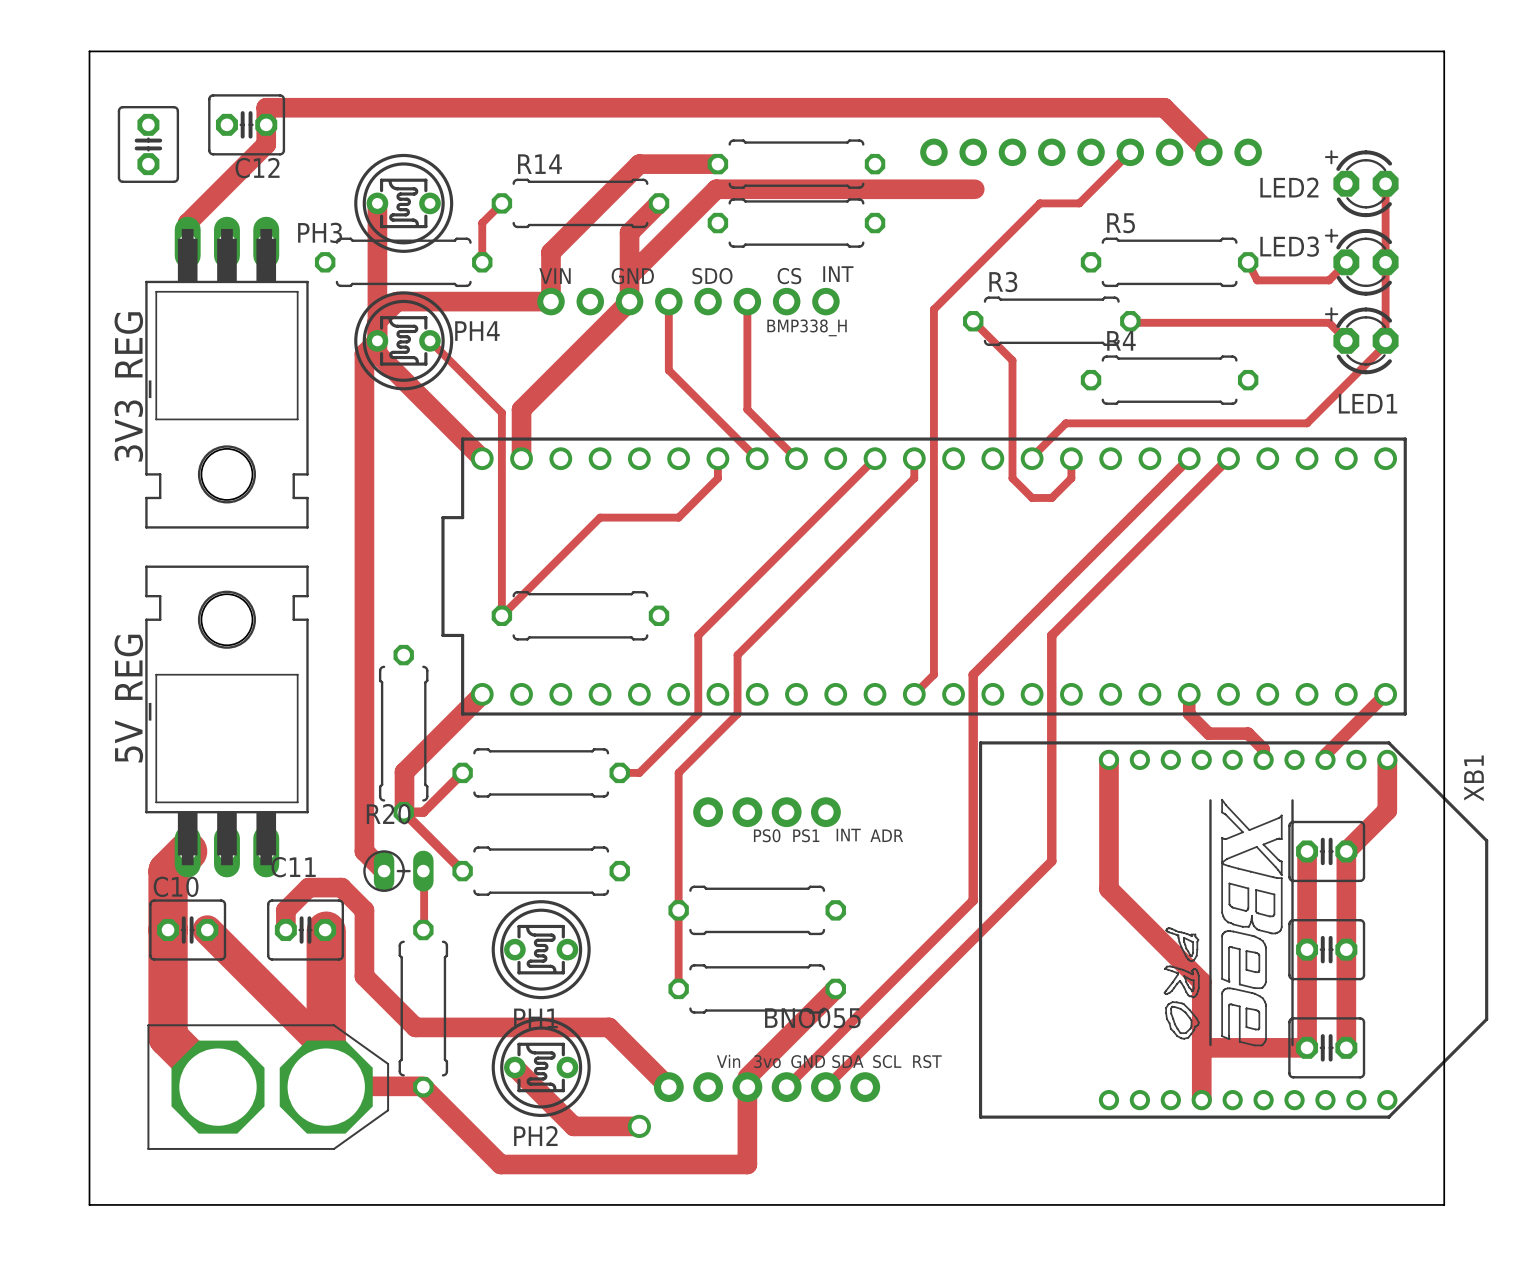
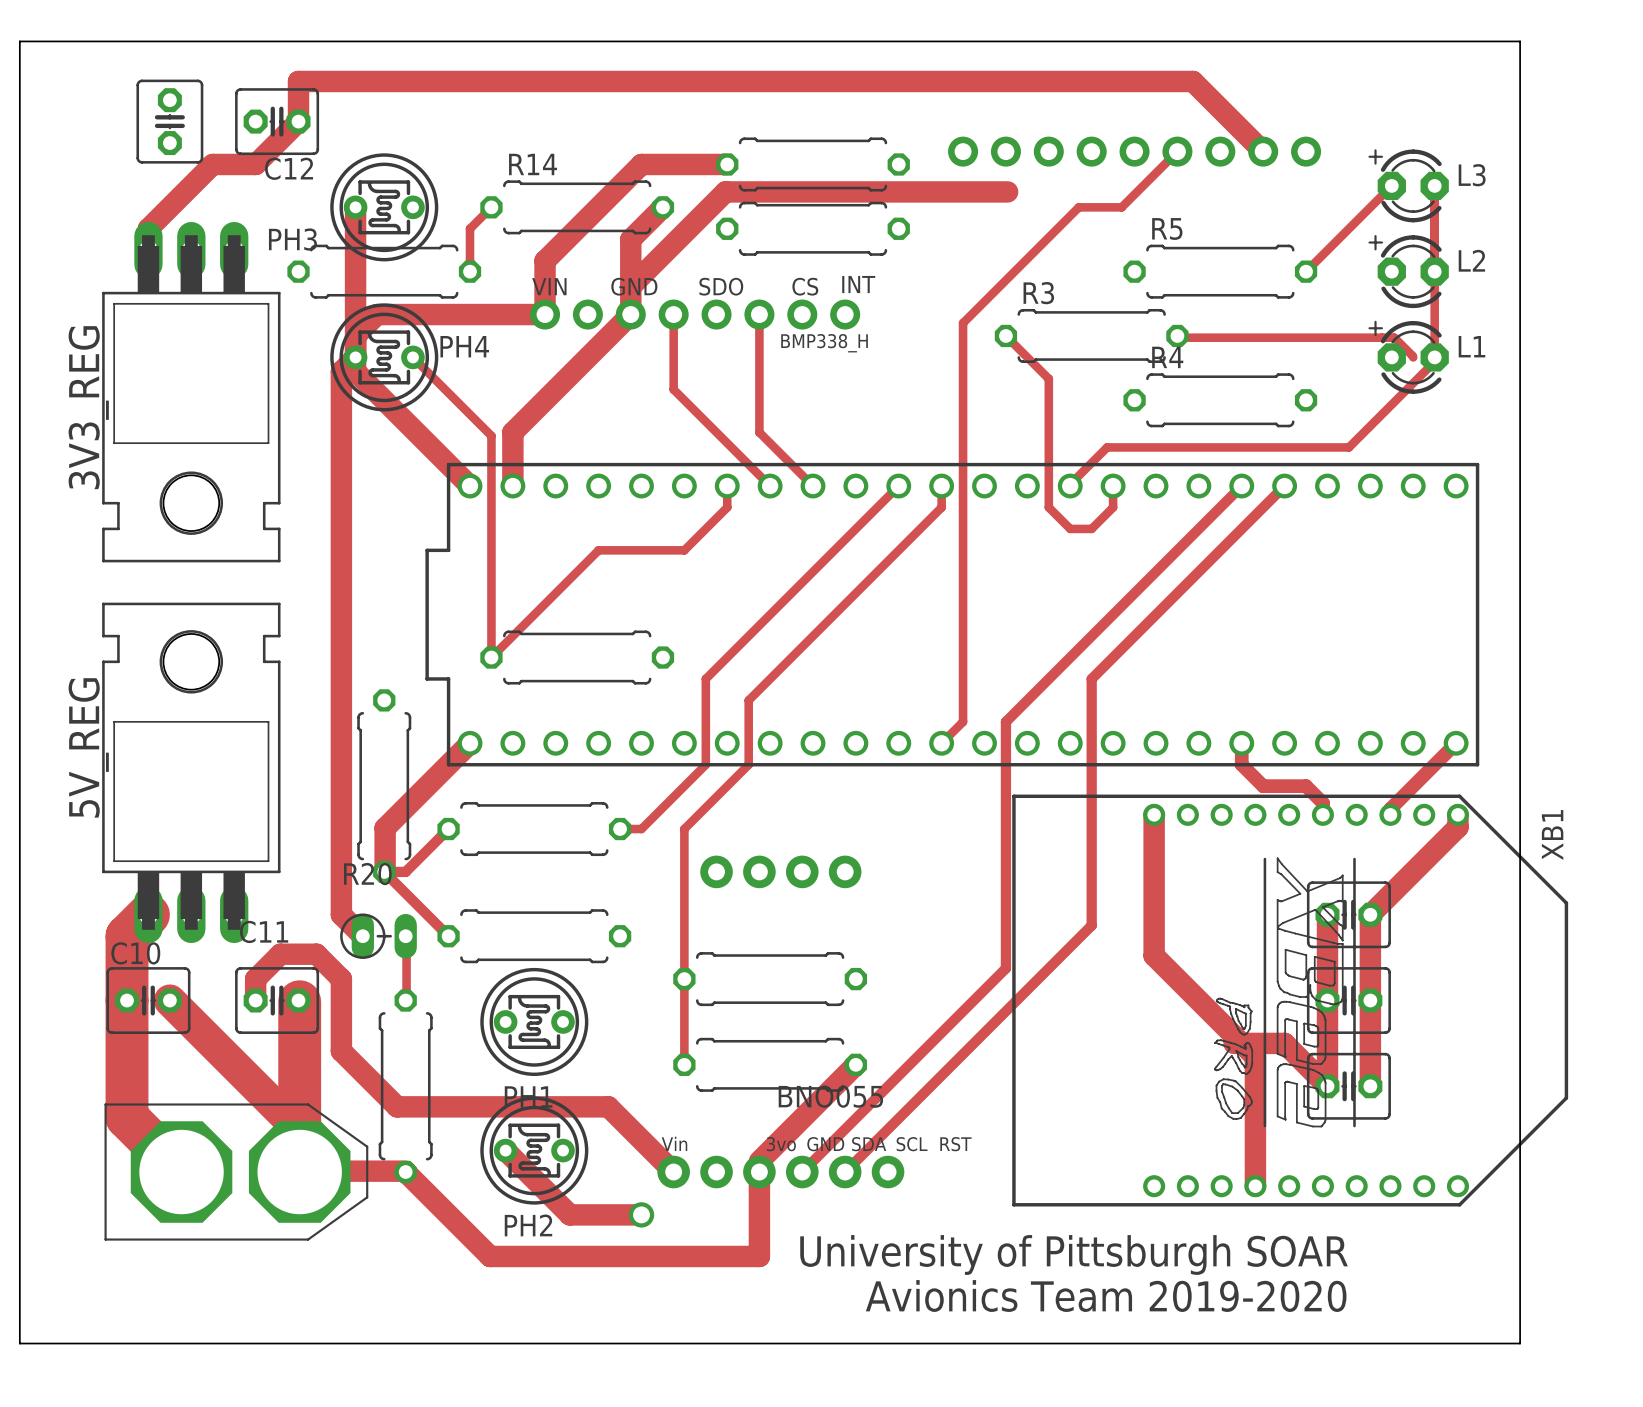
board edge: (89, 51) (89, 1204) (1444, 1204) -> (41, 41) (19, 41) (19, 1343) (1520, 1343) (1520, 1300)
track: (1164, 107) (266, 107) (266, 144) (246, 164) -> (1214, 102) (1193, 81) (298, 81) (298, 121) (255, 164) (212, 164)
C12 position: (246, 124) -> (277, 121)
part position: (148, 144) -> (169, 121)
L3: none -> (1408, 185)
LED2: (1361, 183) -> none
track: (1385, 183) (1385, 340) (1389, 340) (1307, 423) (1287, 423) -> (1434, 185) (1434, 357) (1438, 357) (1348, 447)
track: (1248, 262) (1257, 280) (1329, 280) (1346, 262) -> (1306, 271) (1393, 184)
L2: none -> (1408, 271)
LED3: (1361, 262) -> none
L1: none -> (1408, 357)
LED1: (1361, 340) -> none
track: (1387, 771) (1387, 810) (1346, 851) (1346, 1047) -> (1457, 827) (1370, 914)
text: PS0 (767, 835) -> none
text: PS1 (806, 835) -> none
text: INT (848, 835) -> none
text: ADR (886, 835) -> none
track: none -> (1327, 914) (1327, 1086) (1284, 1043) (1233, 1043)
part position: (1326, 851) -> (1348, 914)
part: none -> (1348, 1000)
part: (1326, 949) -> none
part: none -> (1348, 1086)
track: (1307, 1008) (1307, 1047) (1201, 1047) -> none
part: (1326, 1047) -> none
text position: Vin (728, 1061) -> Vin (674, 1143)
text: none -> University of Pittsburgh SOAR (1074, 1254)
text: none -> Avionics Team 2019-2020 (1106, 1296)

